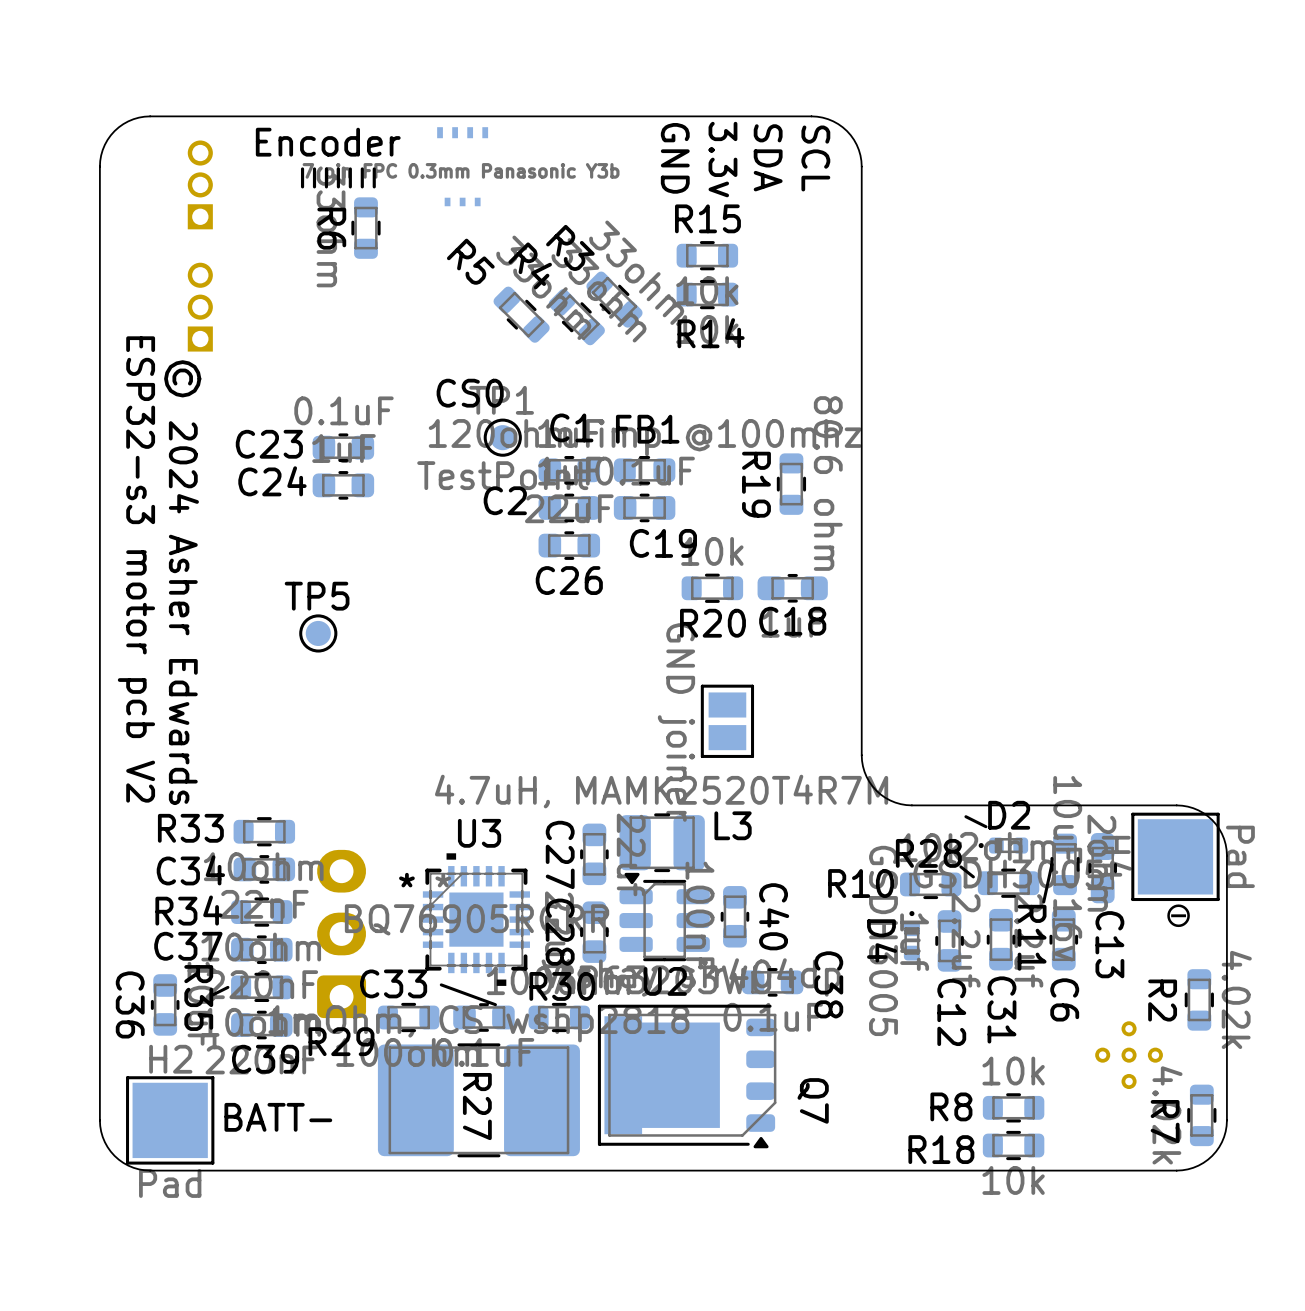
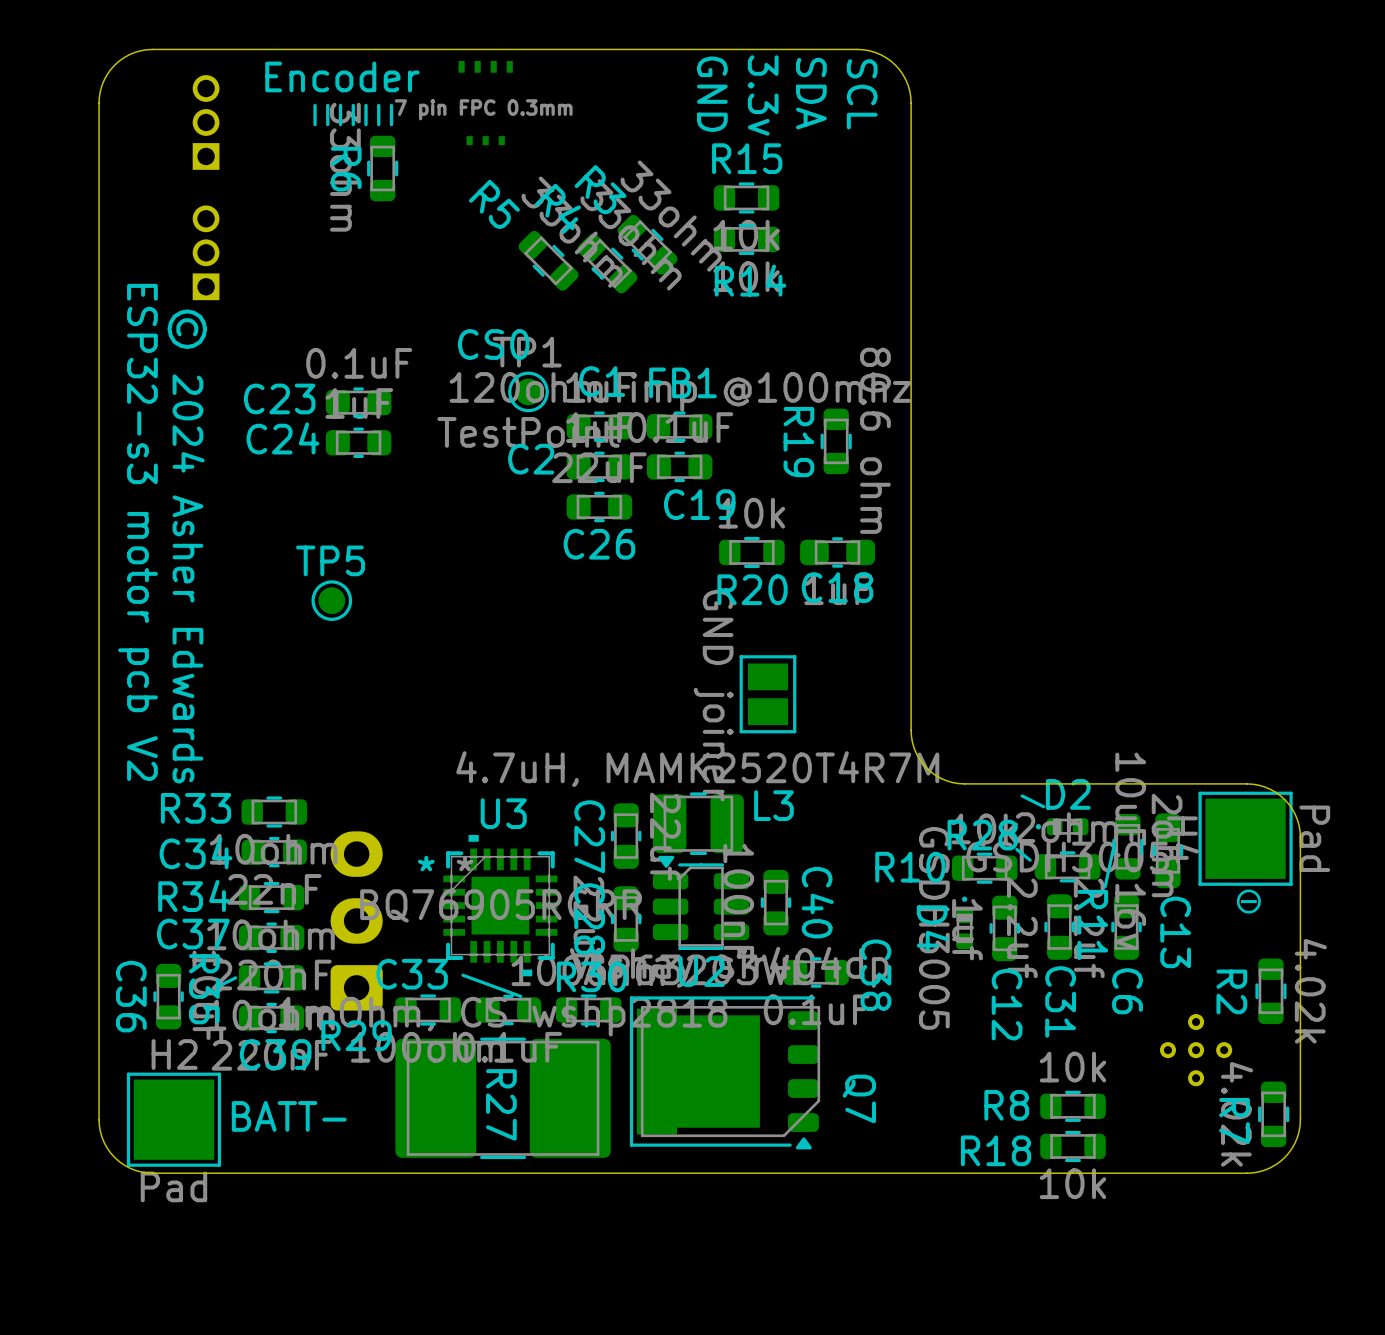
part value: 7 pin FPC 0.3mm Panasonic Y3b (461, 172) -> 7 pin FPC 0.3mm (483, 109)

